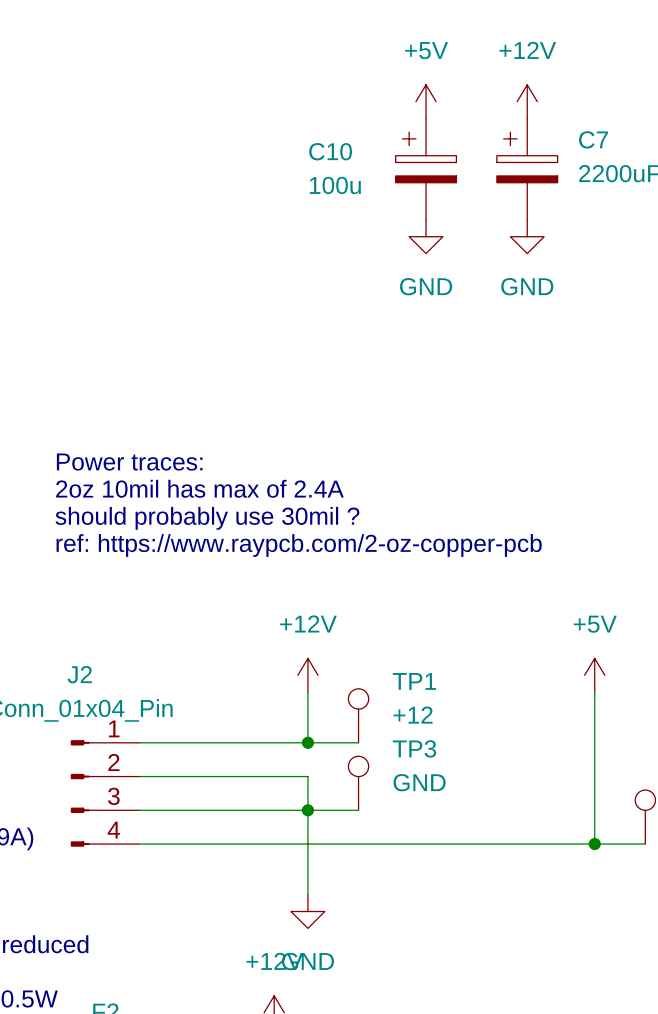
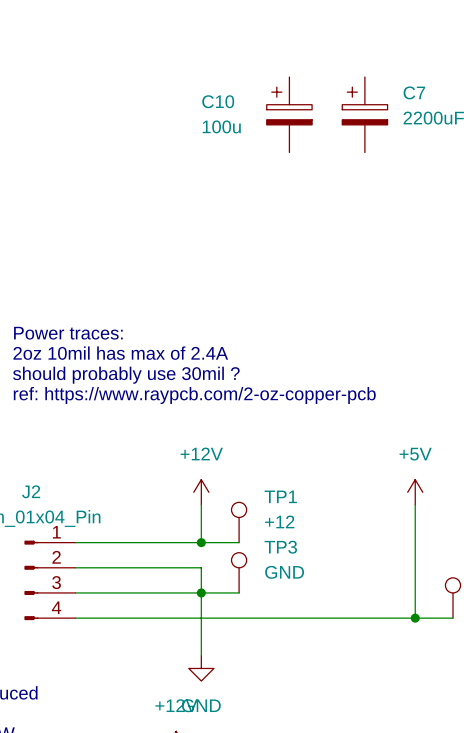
power symbol: +5V (426, 101) -> none
power symbol: +12V (527, 101) -> none
power symbol: GND (426, 236) -> none
power symbol: GND (527, 236) -> none

